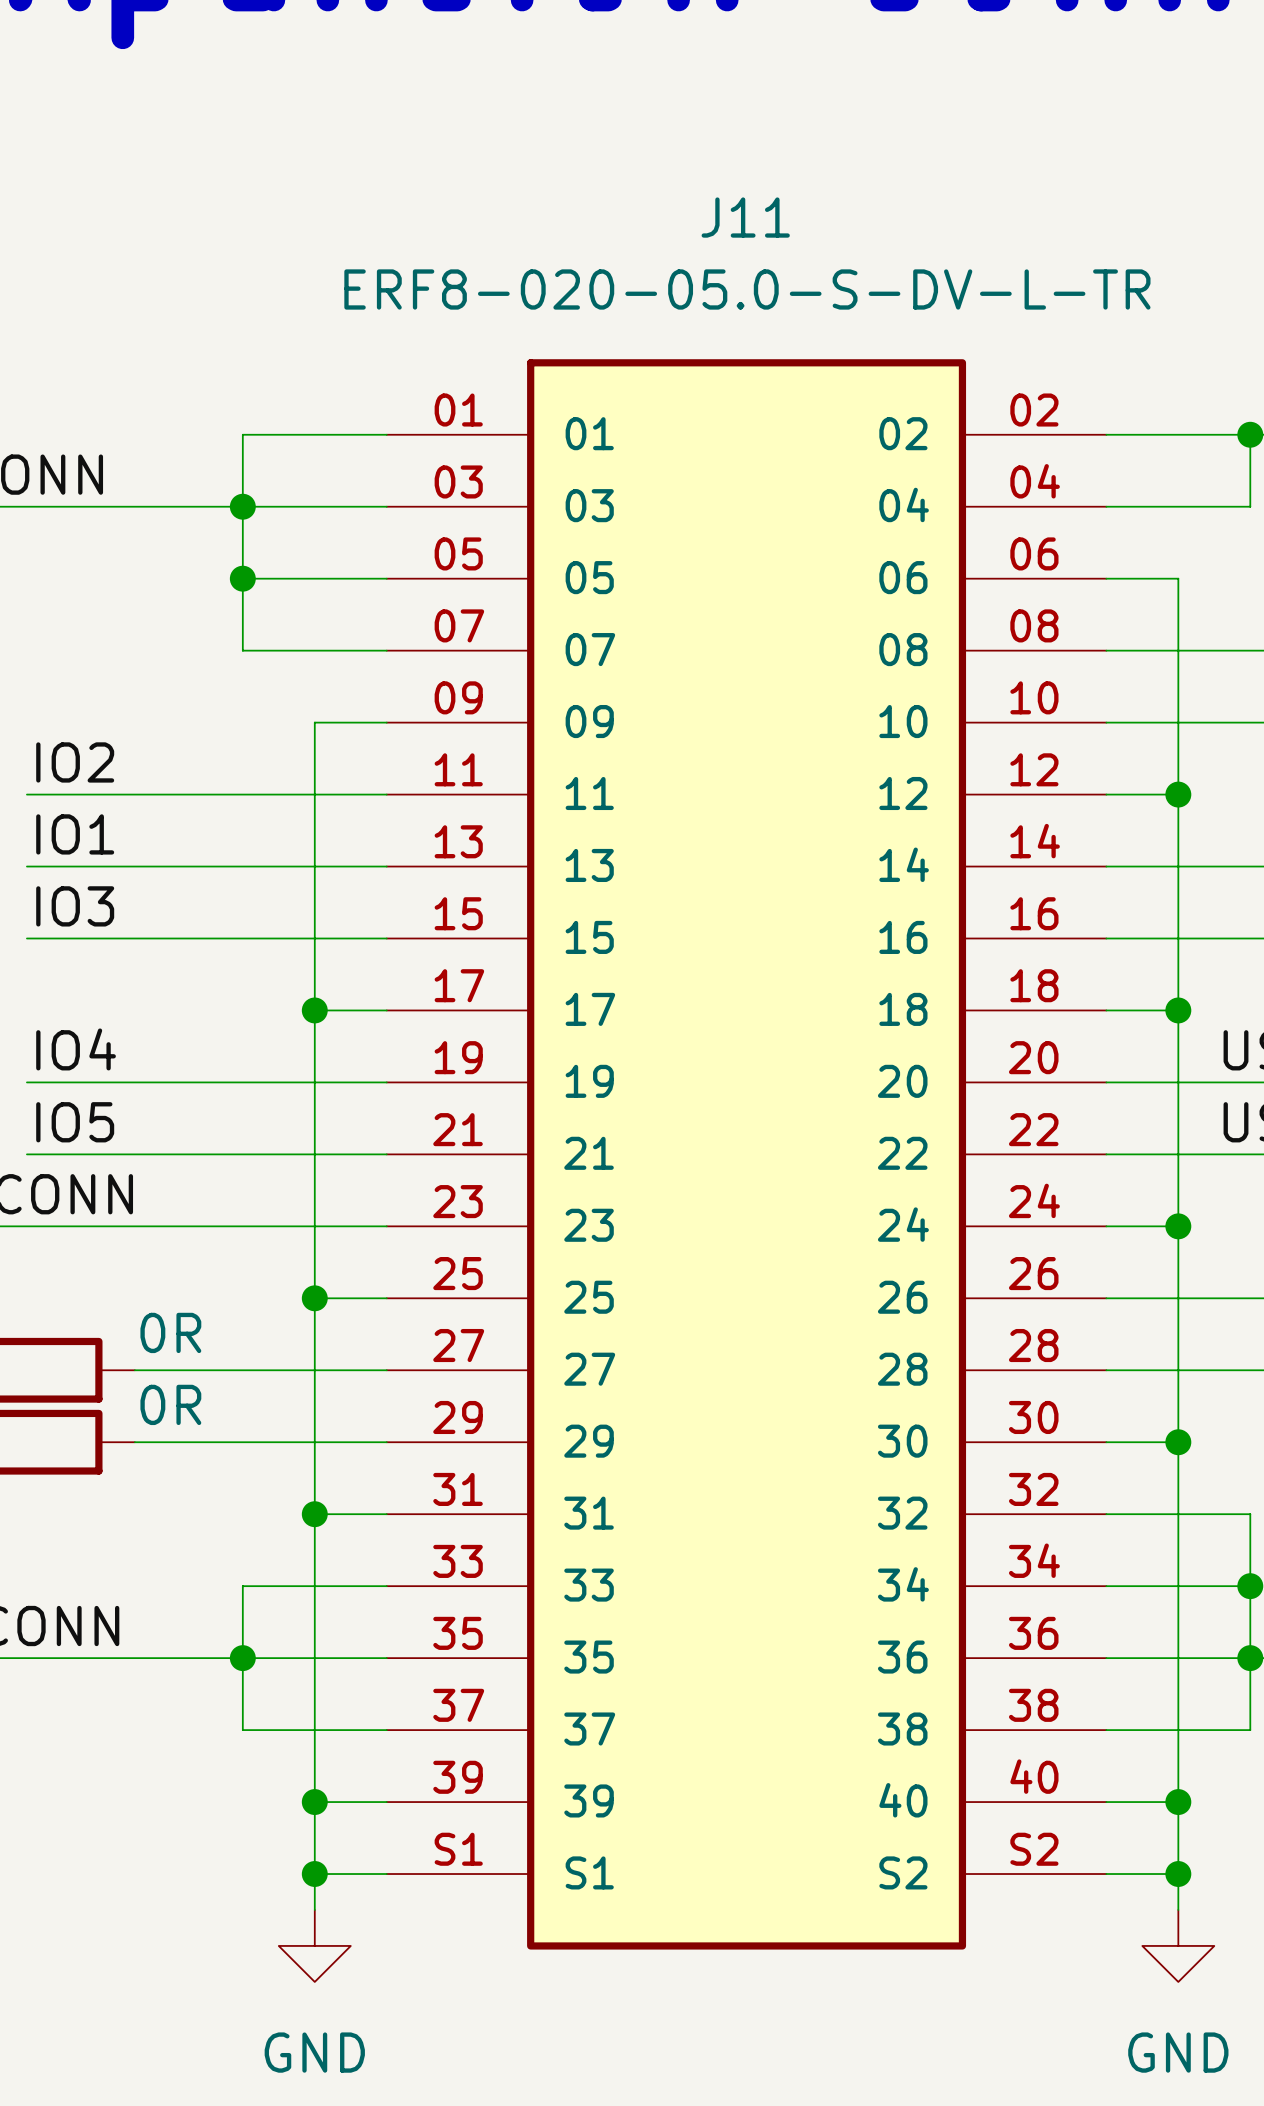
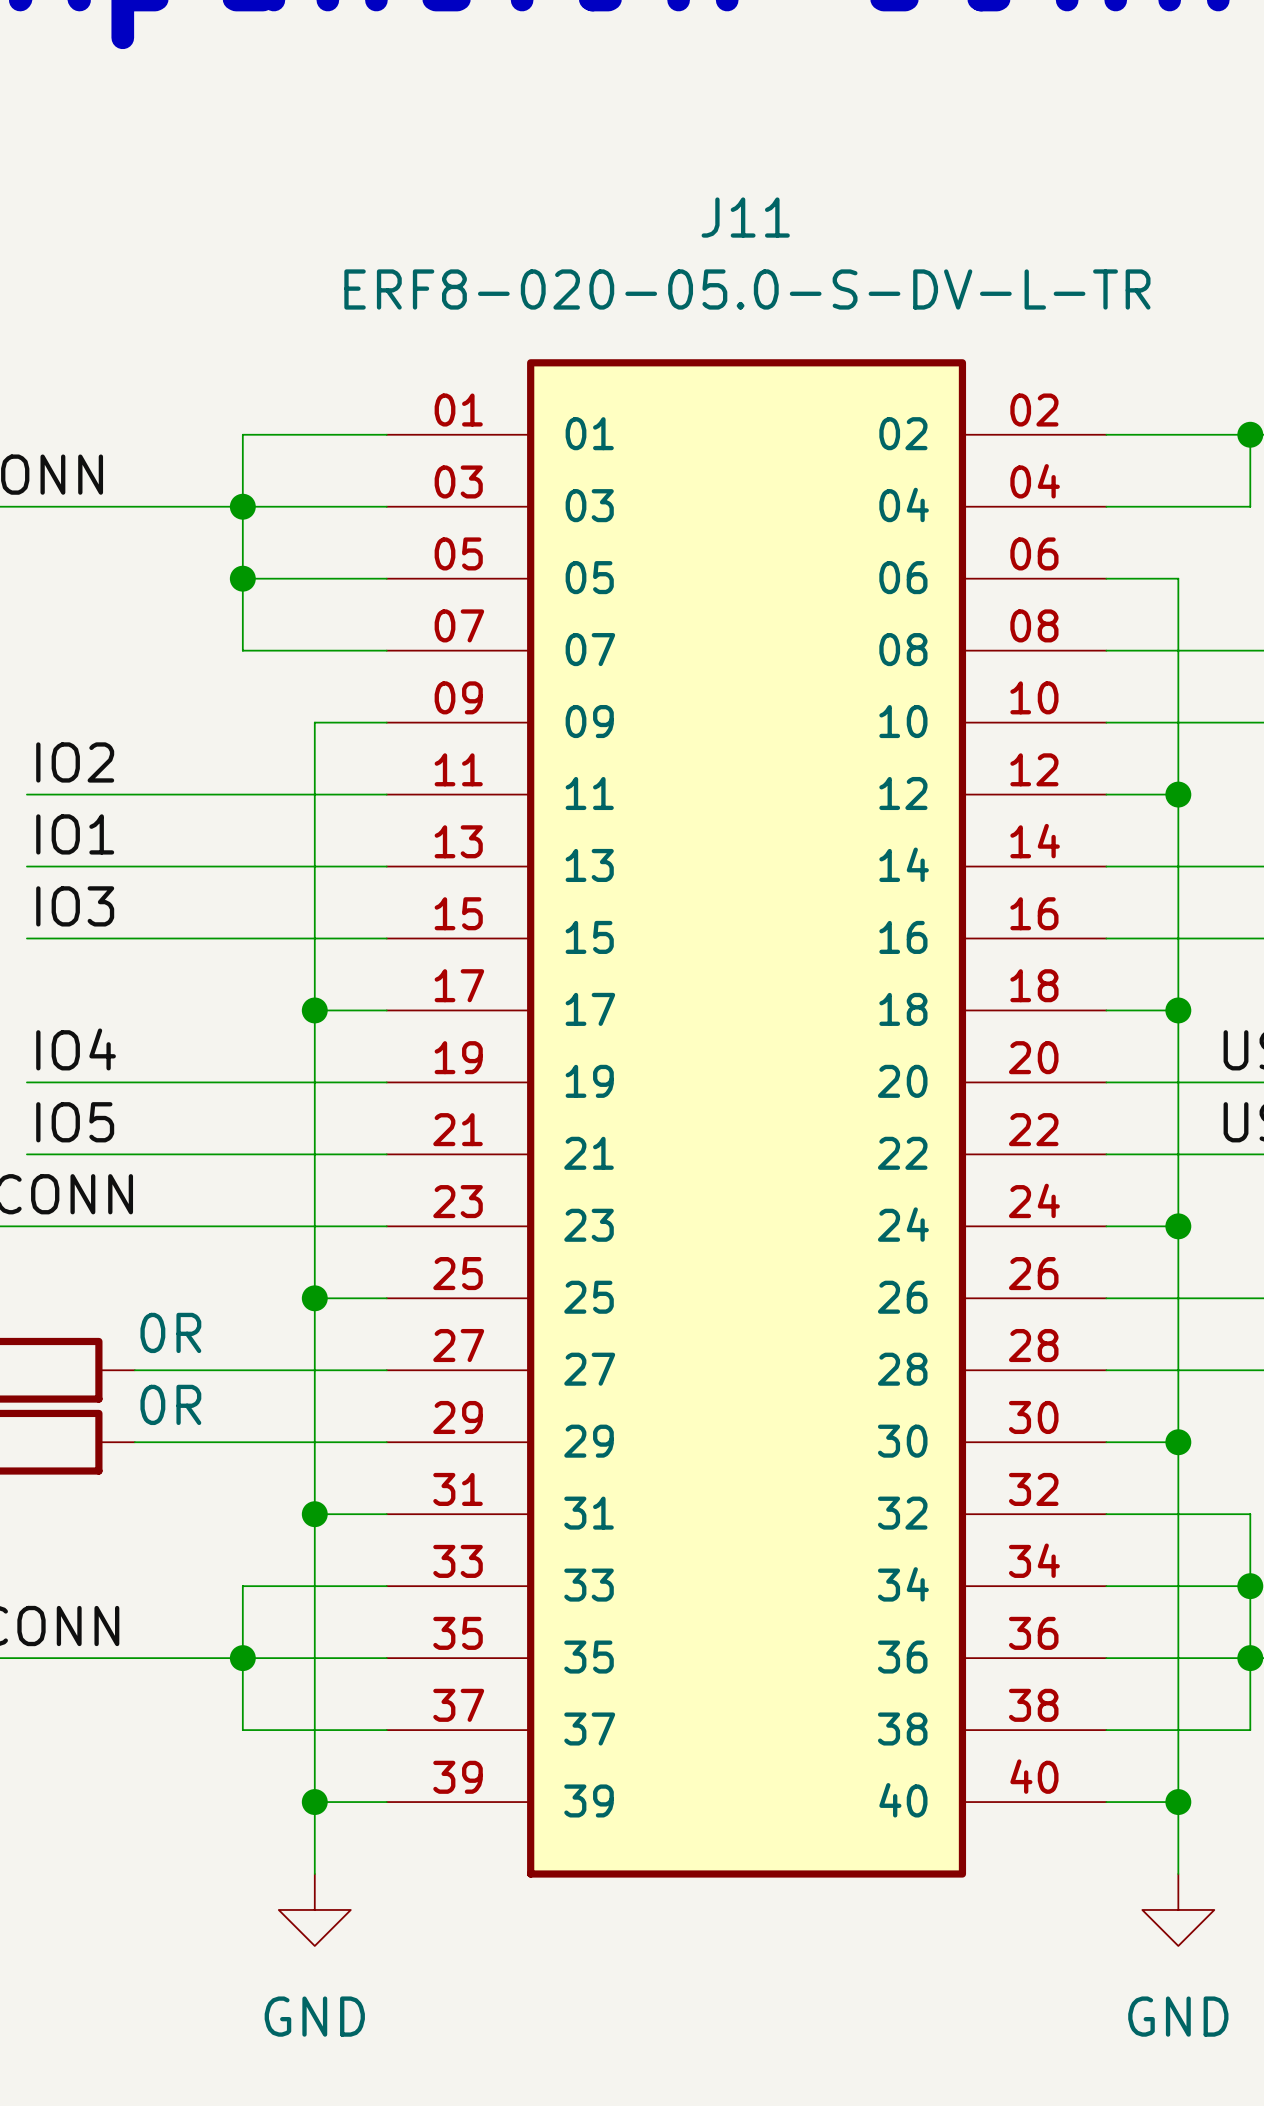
J11 symbol: [386, 359, 1107, 1950] -> [386, 359, 1107, 1878]
junction: (314, 1874) -> none
wire: (386, 1874) (314, 1874) (314, 1909) -> none
wire: (1106, 1874) (1178, 1874) (1178, 1909) -> none
junction: (1178, 1874) -> none
power symbol position: GND (314, 1945) -> GND (314, 1909)
power symbol position: GND (1178, 1945) -> GND (1178, 1909)

